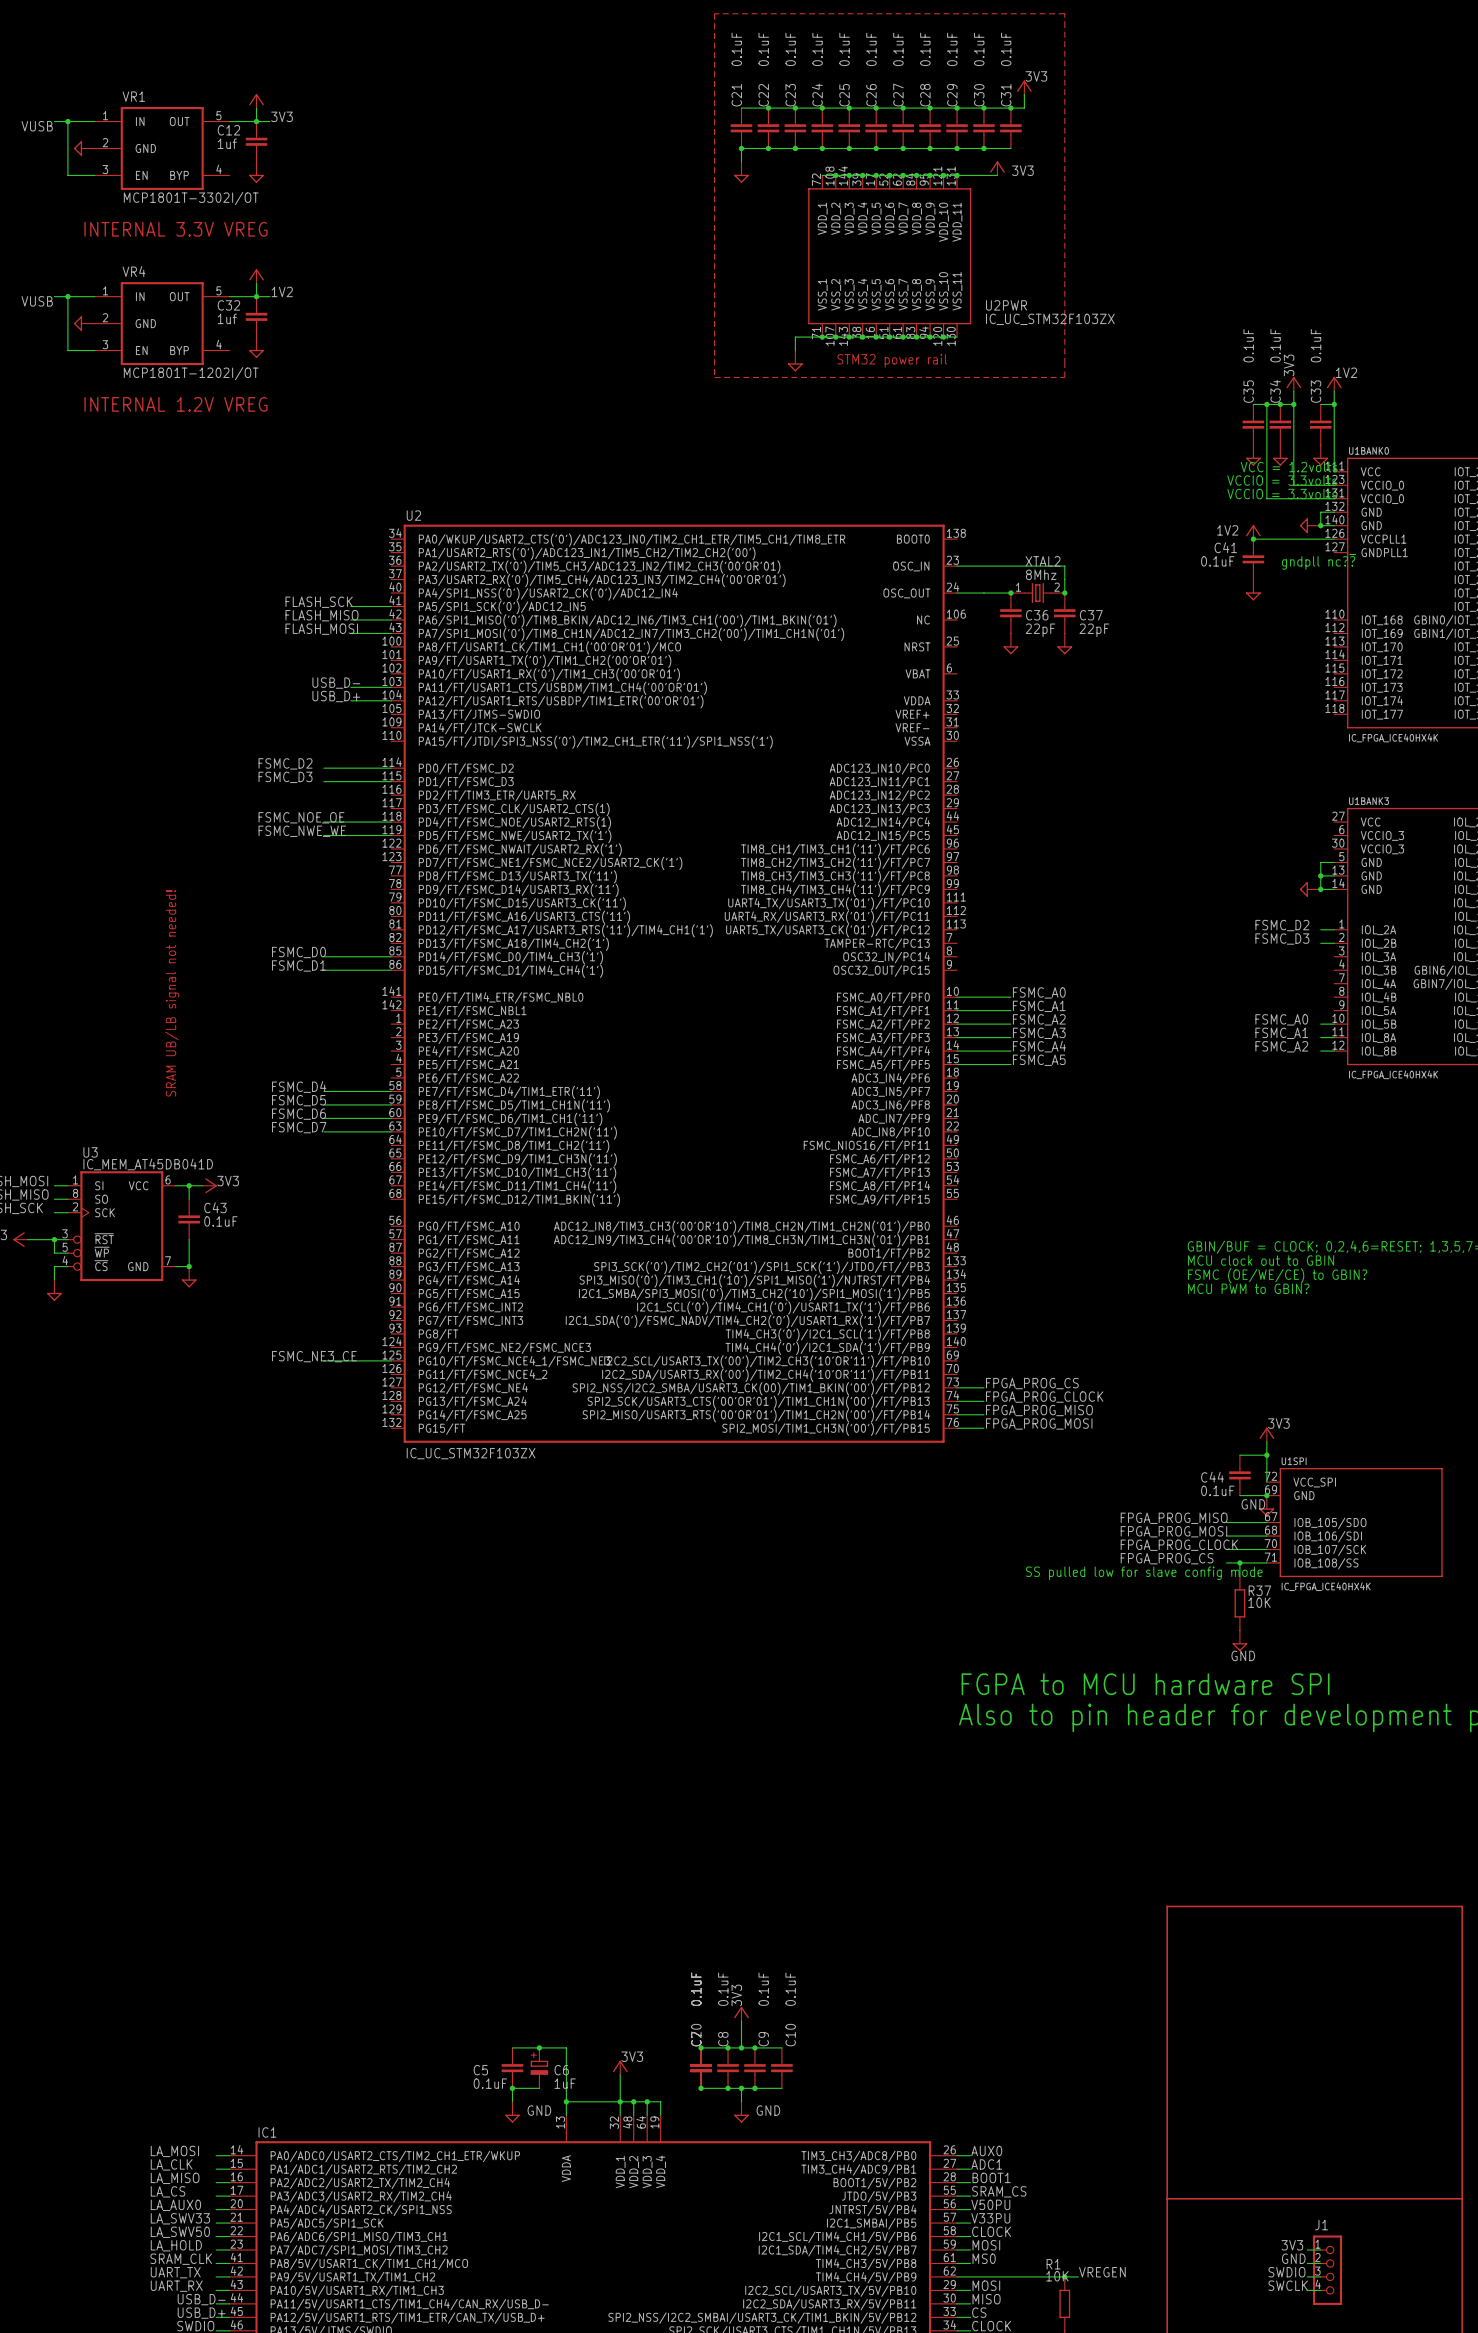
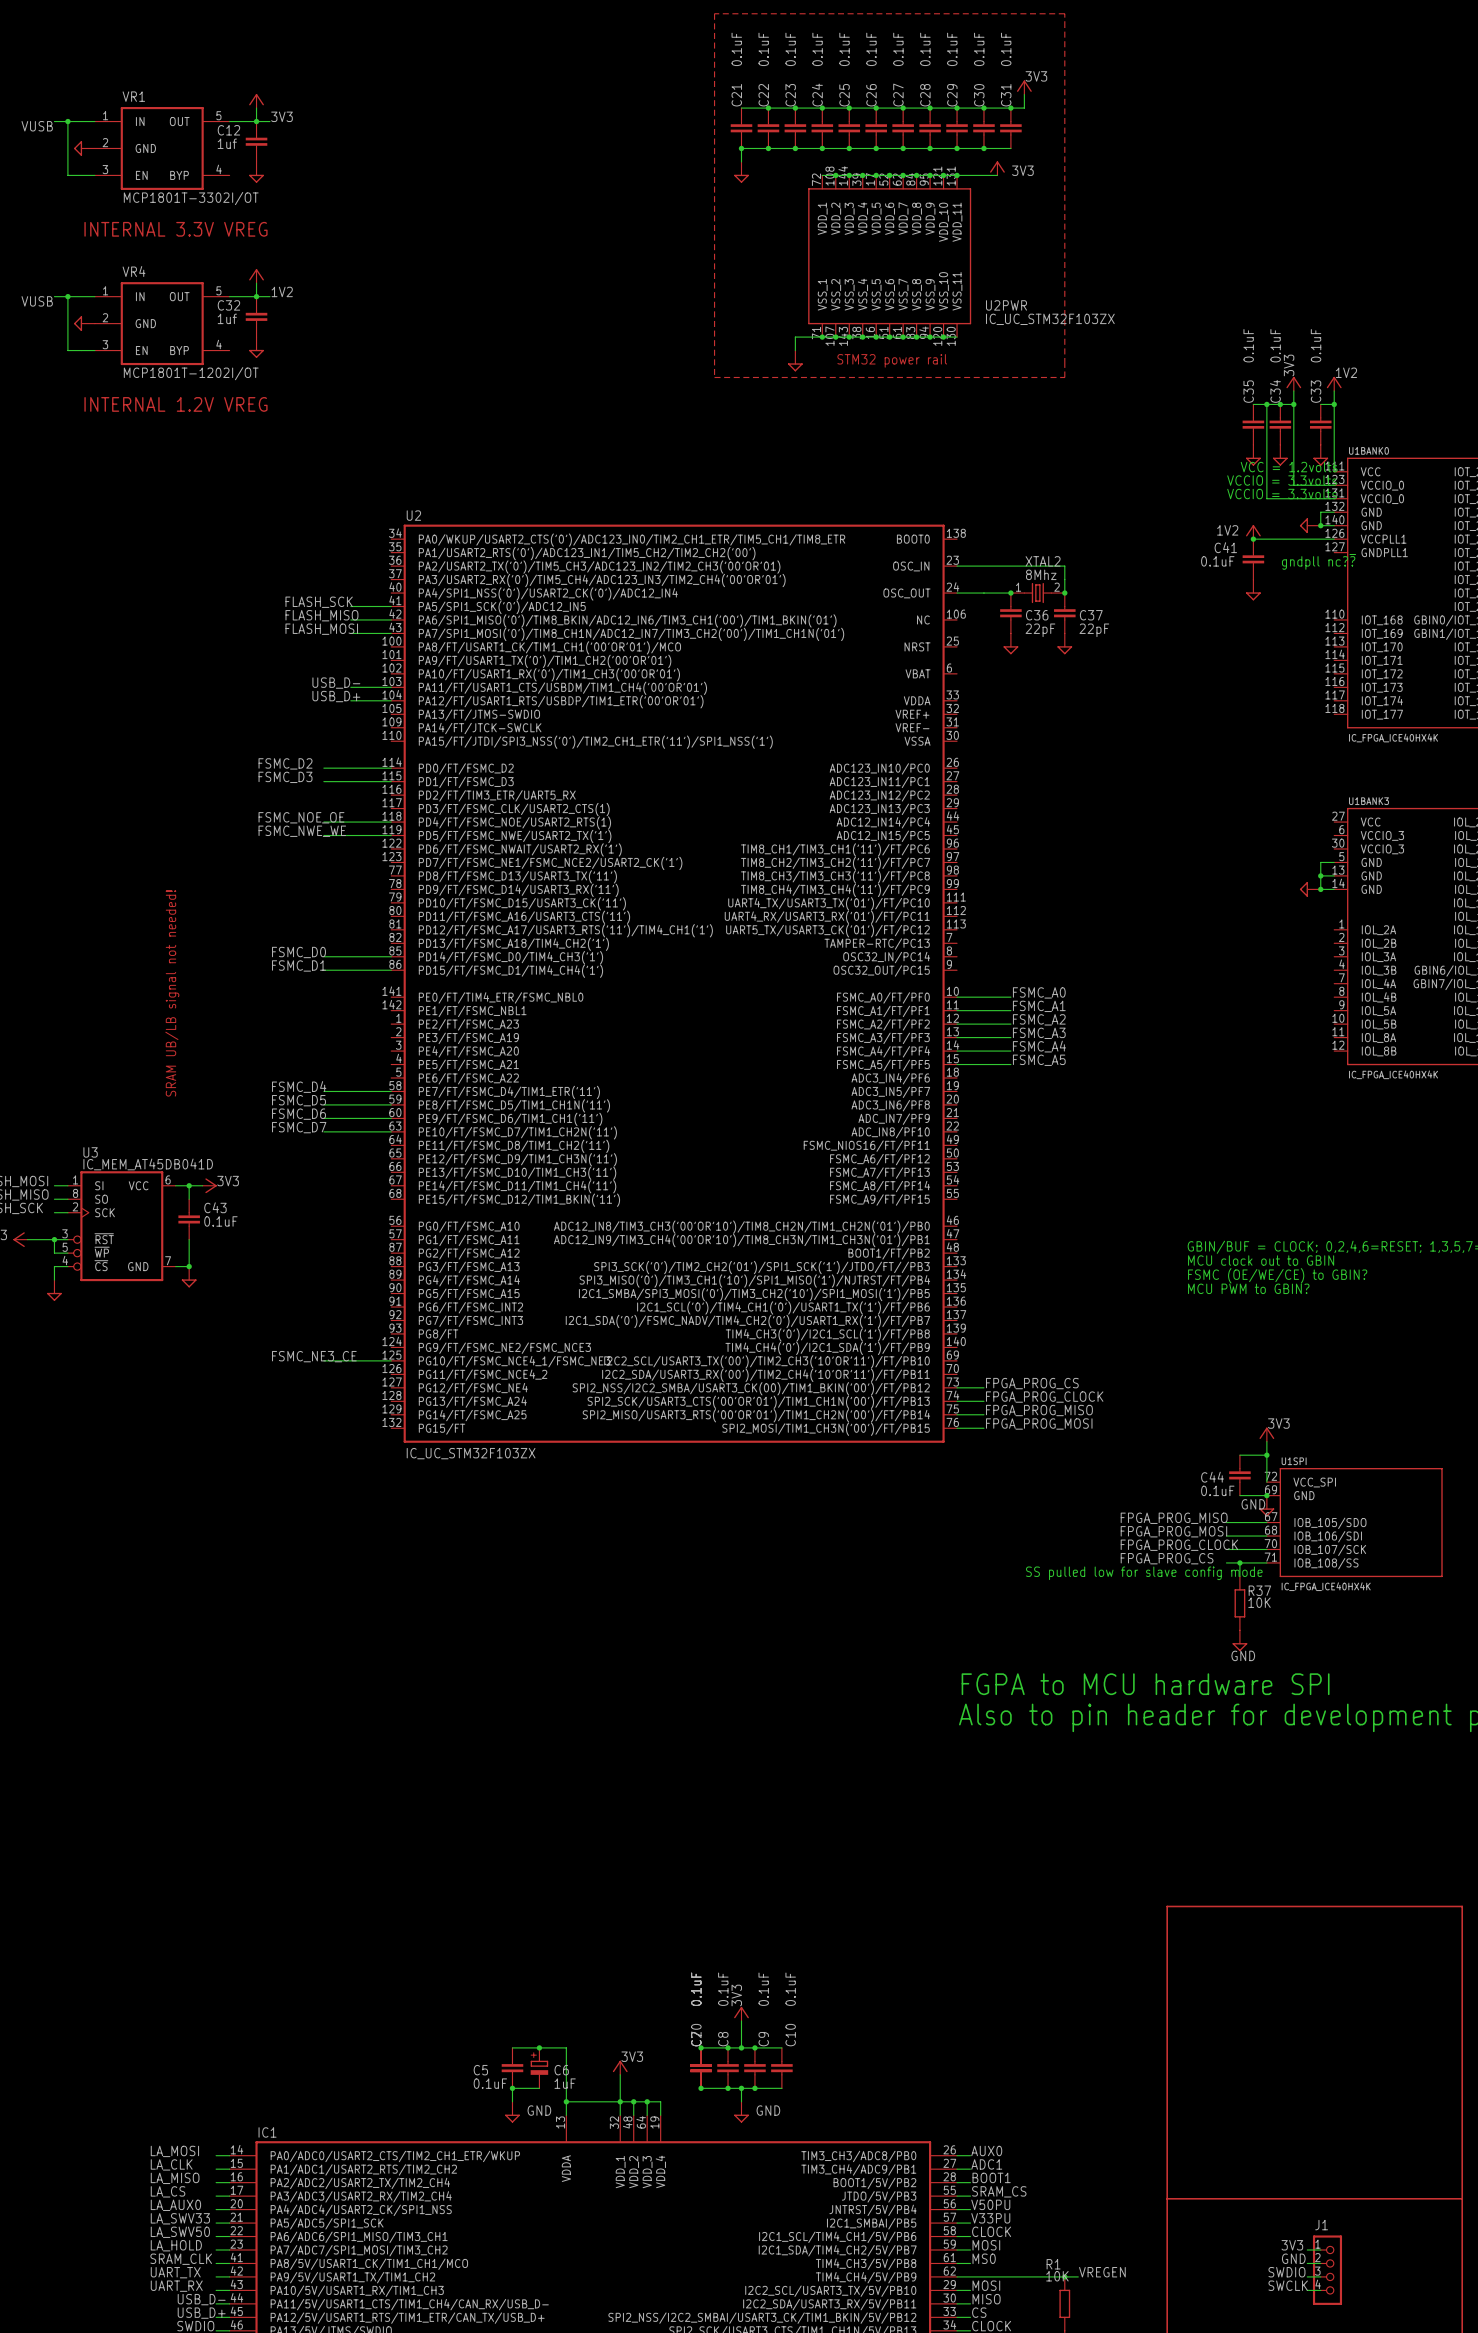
label: FSMC_D2 (1282, 925) -> none
wire: (1320, 929) (1334, 929) -> none
label: FSMC_D3 (1282, 939) -> none
wire: (1320, 943) (1334, 943) -> none
label: FSMC_A0 (1281, 1019) -> none
wire: (1320, 1024) (1334, 1024) -> none
label: FSMC_A1 (1281, 1033) -> none
wire: (1320, 1037) (1334, 1037) -> none
label: FSMC_A2 (1281, 1046) -> none
wire: (1320, 1051) (1334, 1051) -> none

